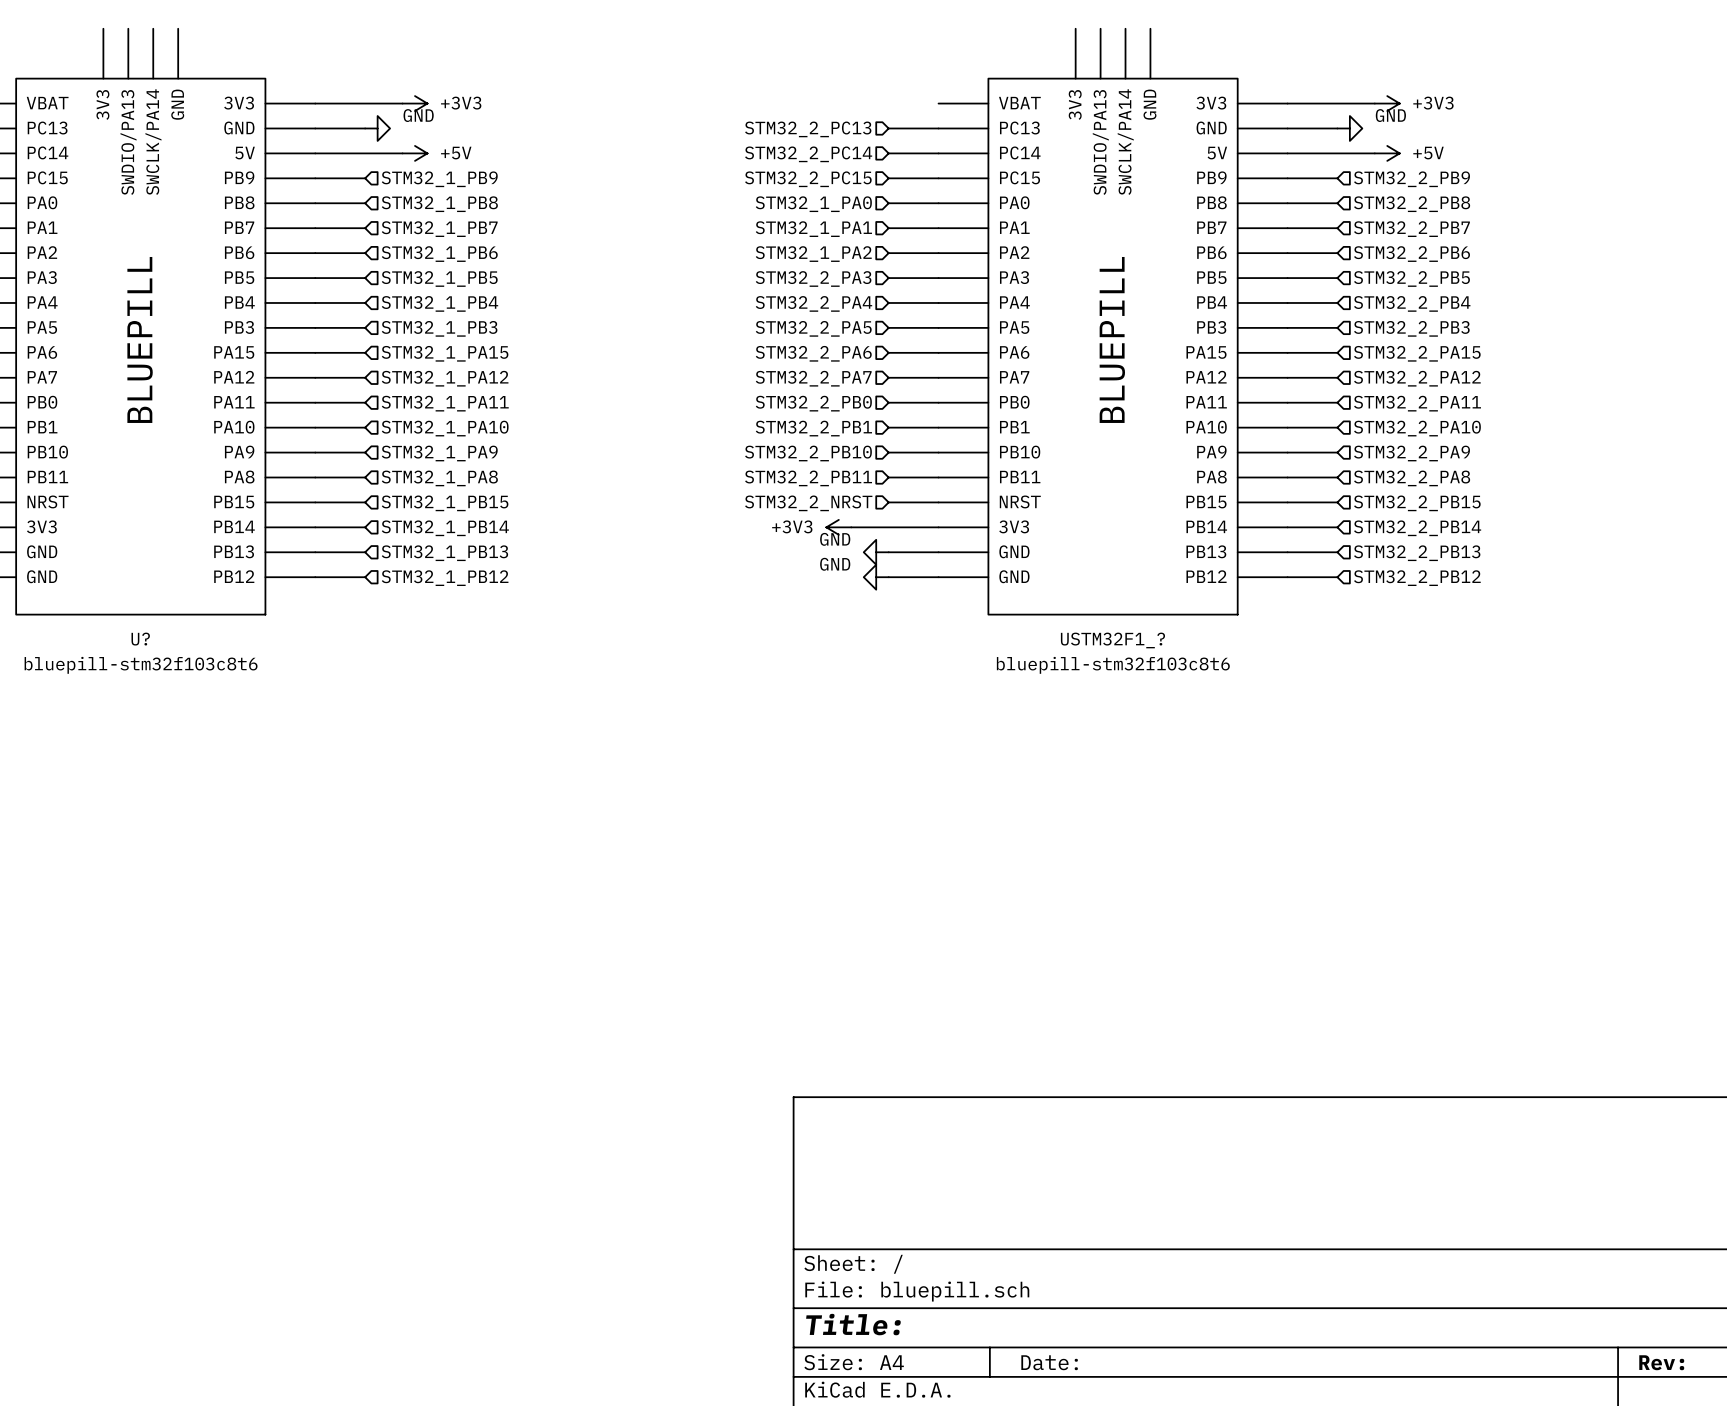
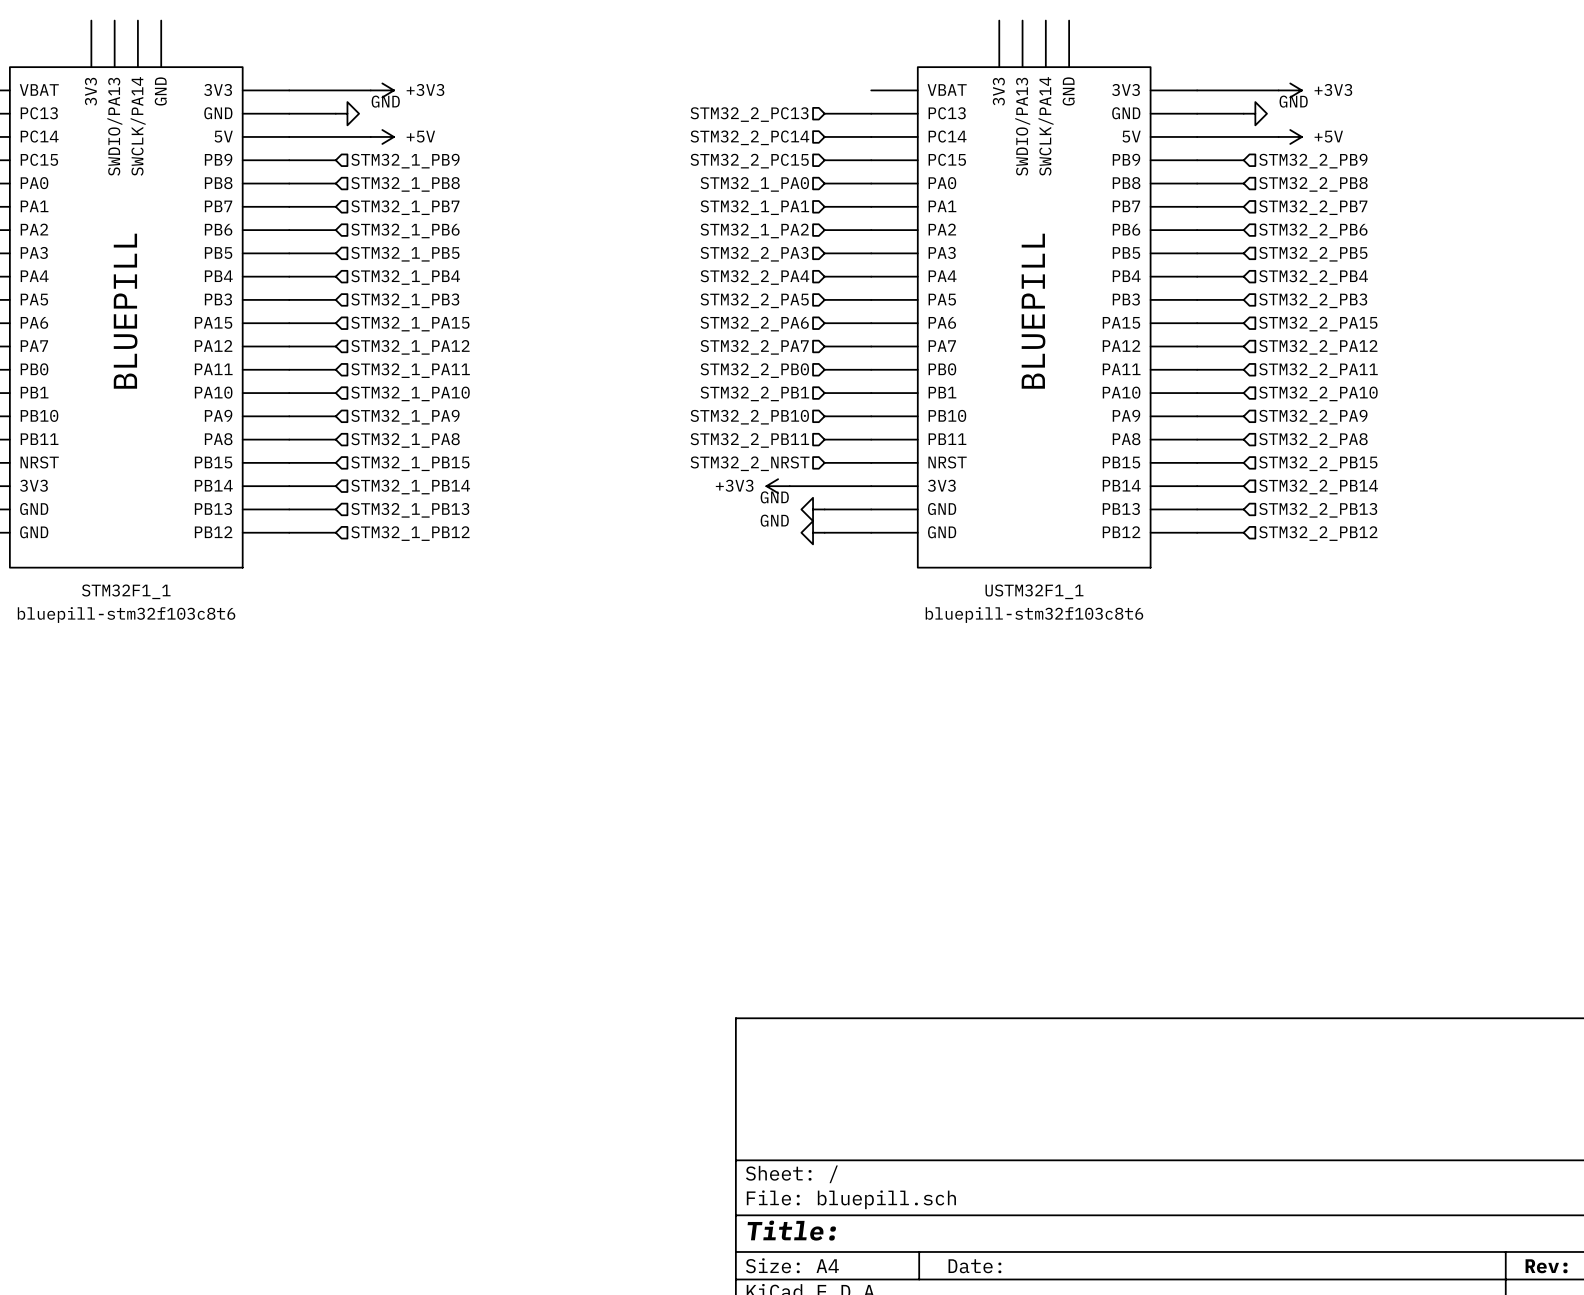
U? name: U? (140, 639) -> STM32F1_1 (126, 591)
USTM32F1_? name: USTM32F1_? (1112, 640) -> USTM32F1_1 (1034, 591)

